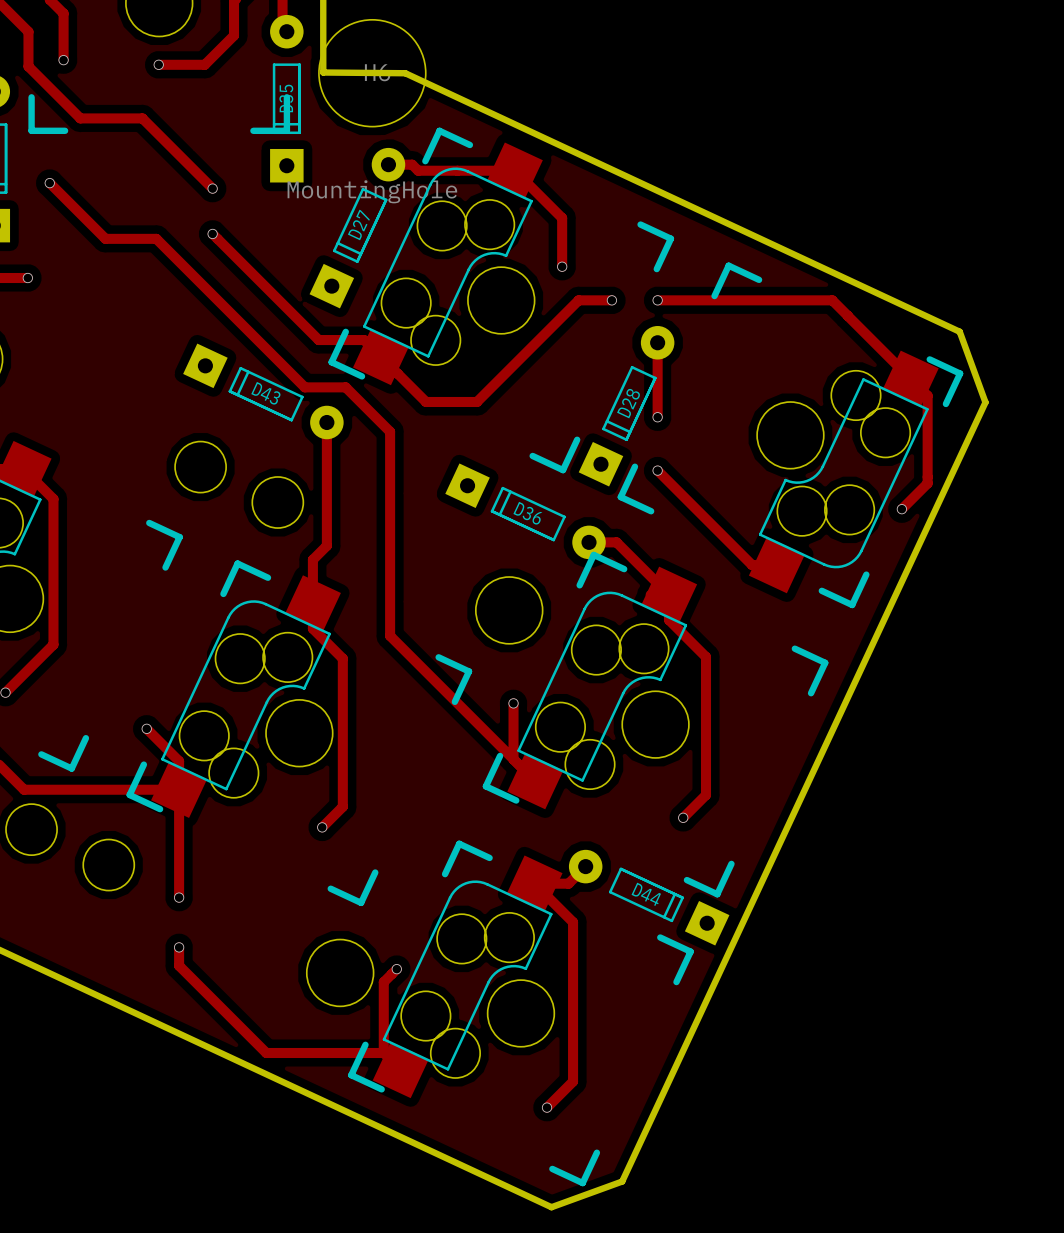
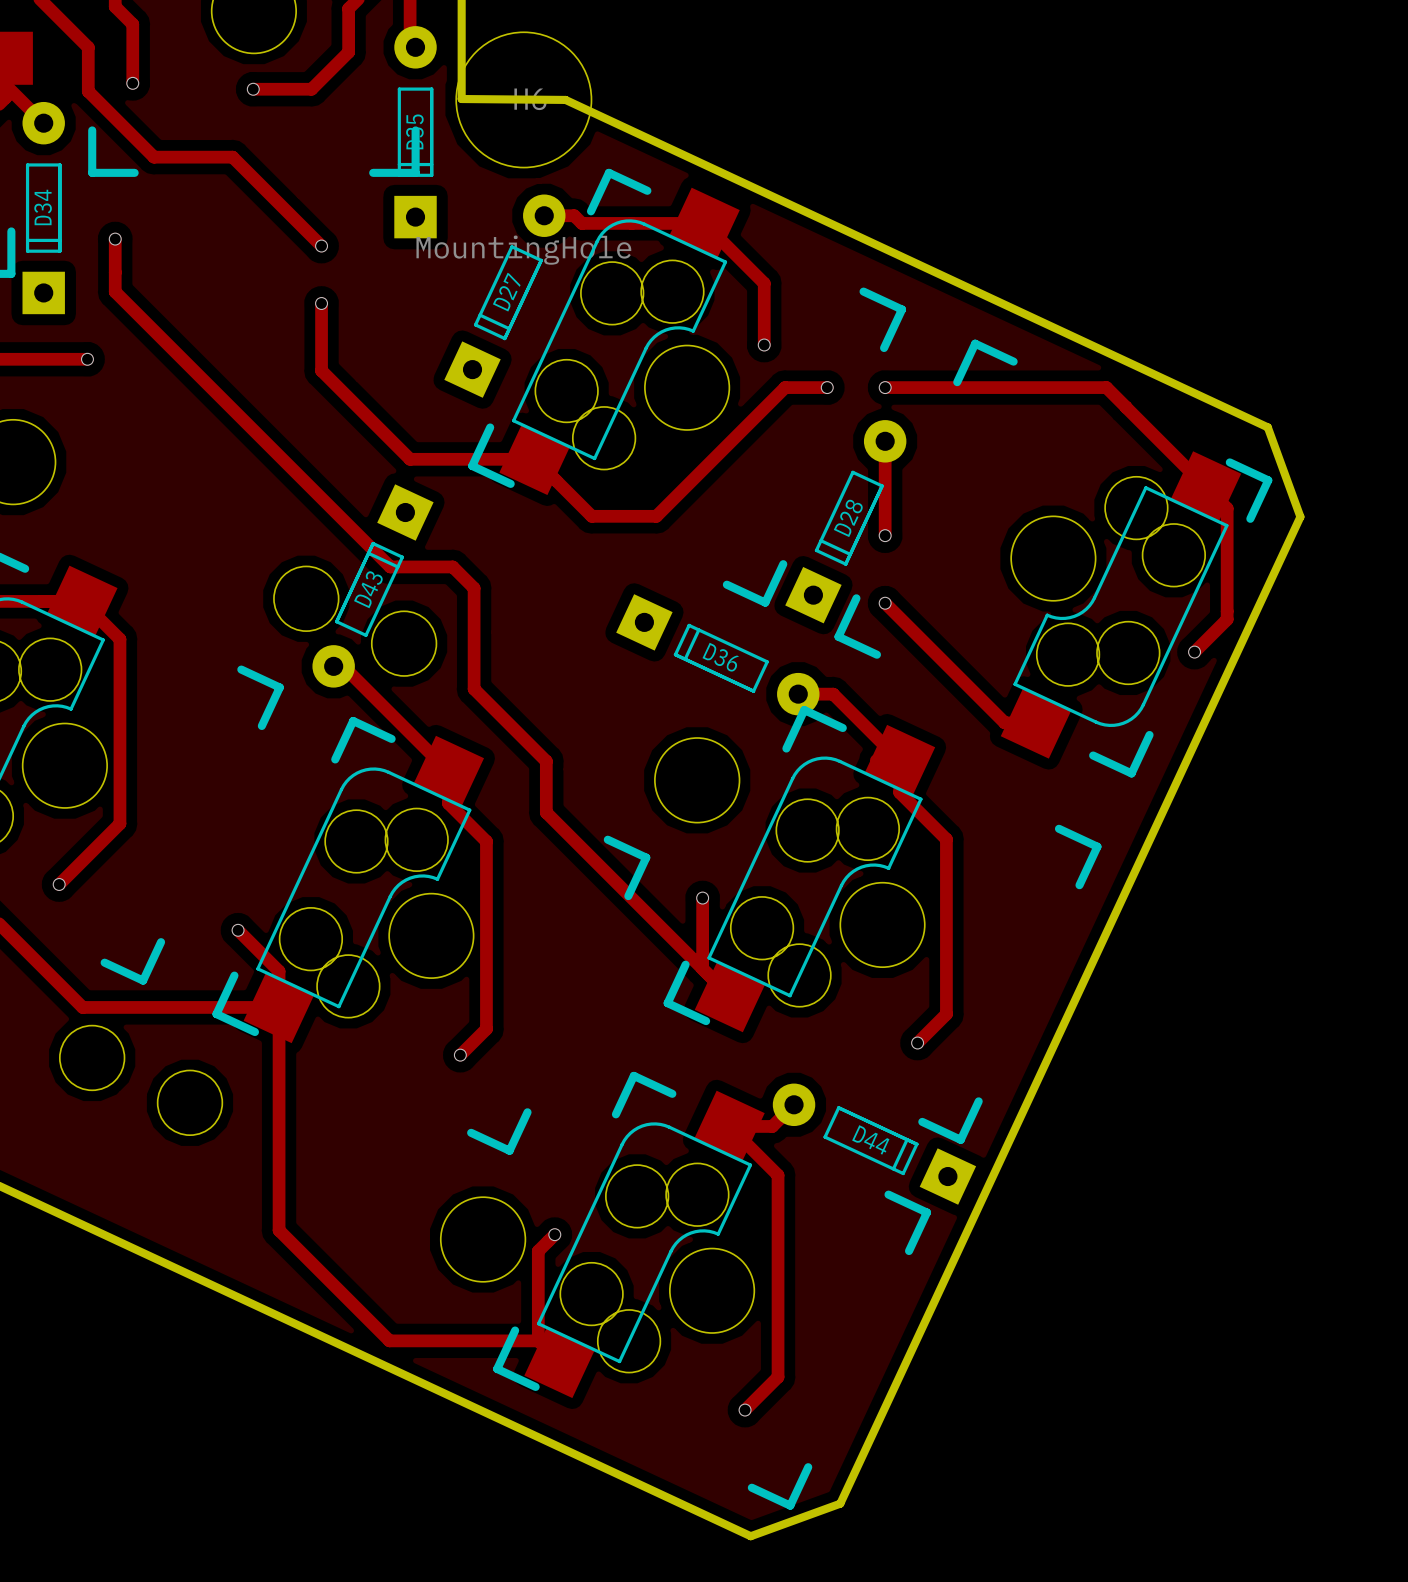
track: (49, 183) (105, 238) (156, 238) (304, 387) (345, 387) (390, 431) (390, 595) -> (115, 239) (115, 291) (390, 566) (452, 566) (474, 588) (474, 689) (546, 761)
track: (212, 233) (318, 340) (364, 340) (381, 356) -> (321, 303) (321, 370) (410, 459) (534, 459)
D43 rotation: 0° (263, 391) -> 90° clockwise (373, 585)
track: (326, 422) (326, 545) (312, 559) (312, 603) -> (333, 666) (343, 666) (448, 771)
track: none -> (279, 1144) (279, 1207)
via: (179, 897) -> none
via: (179, 947) -> none

